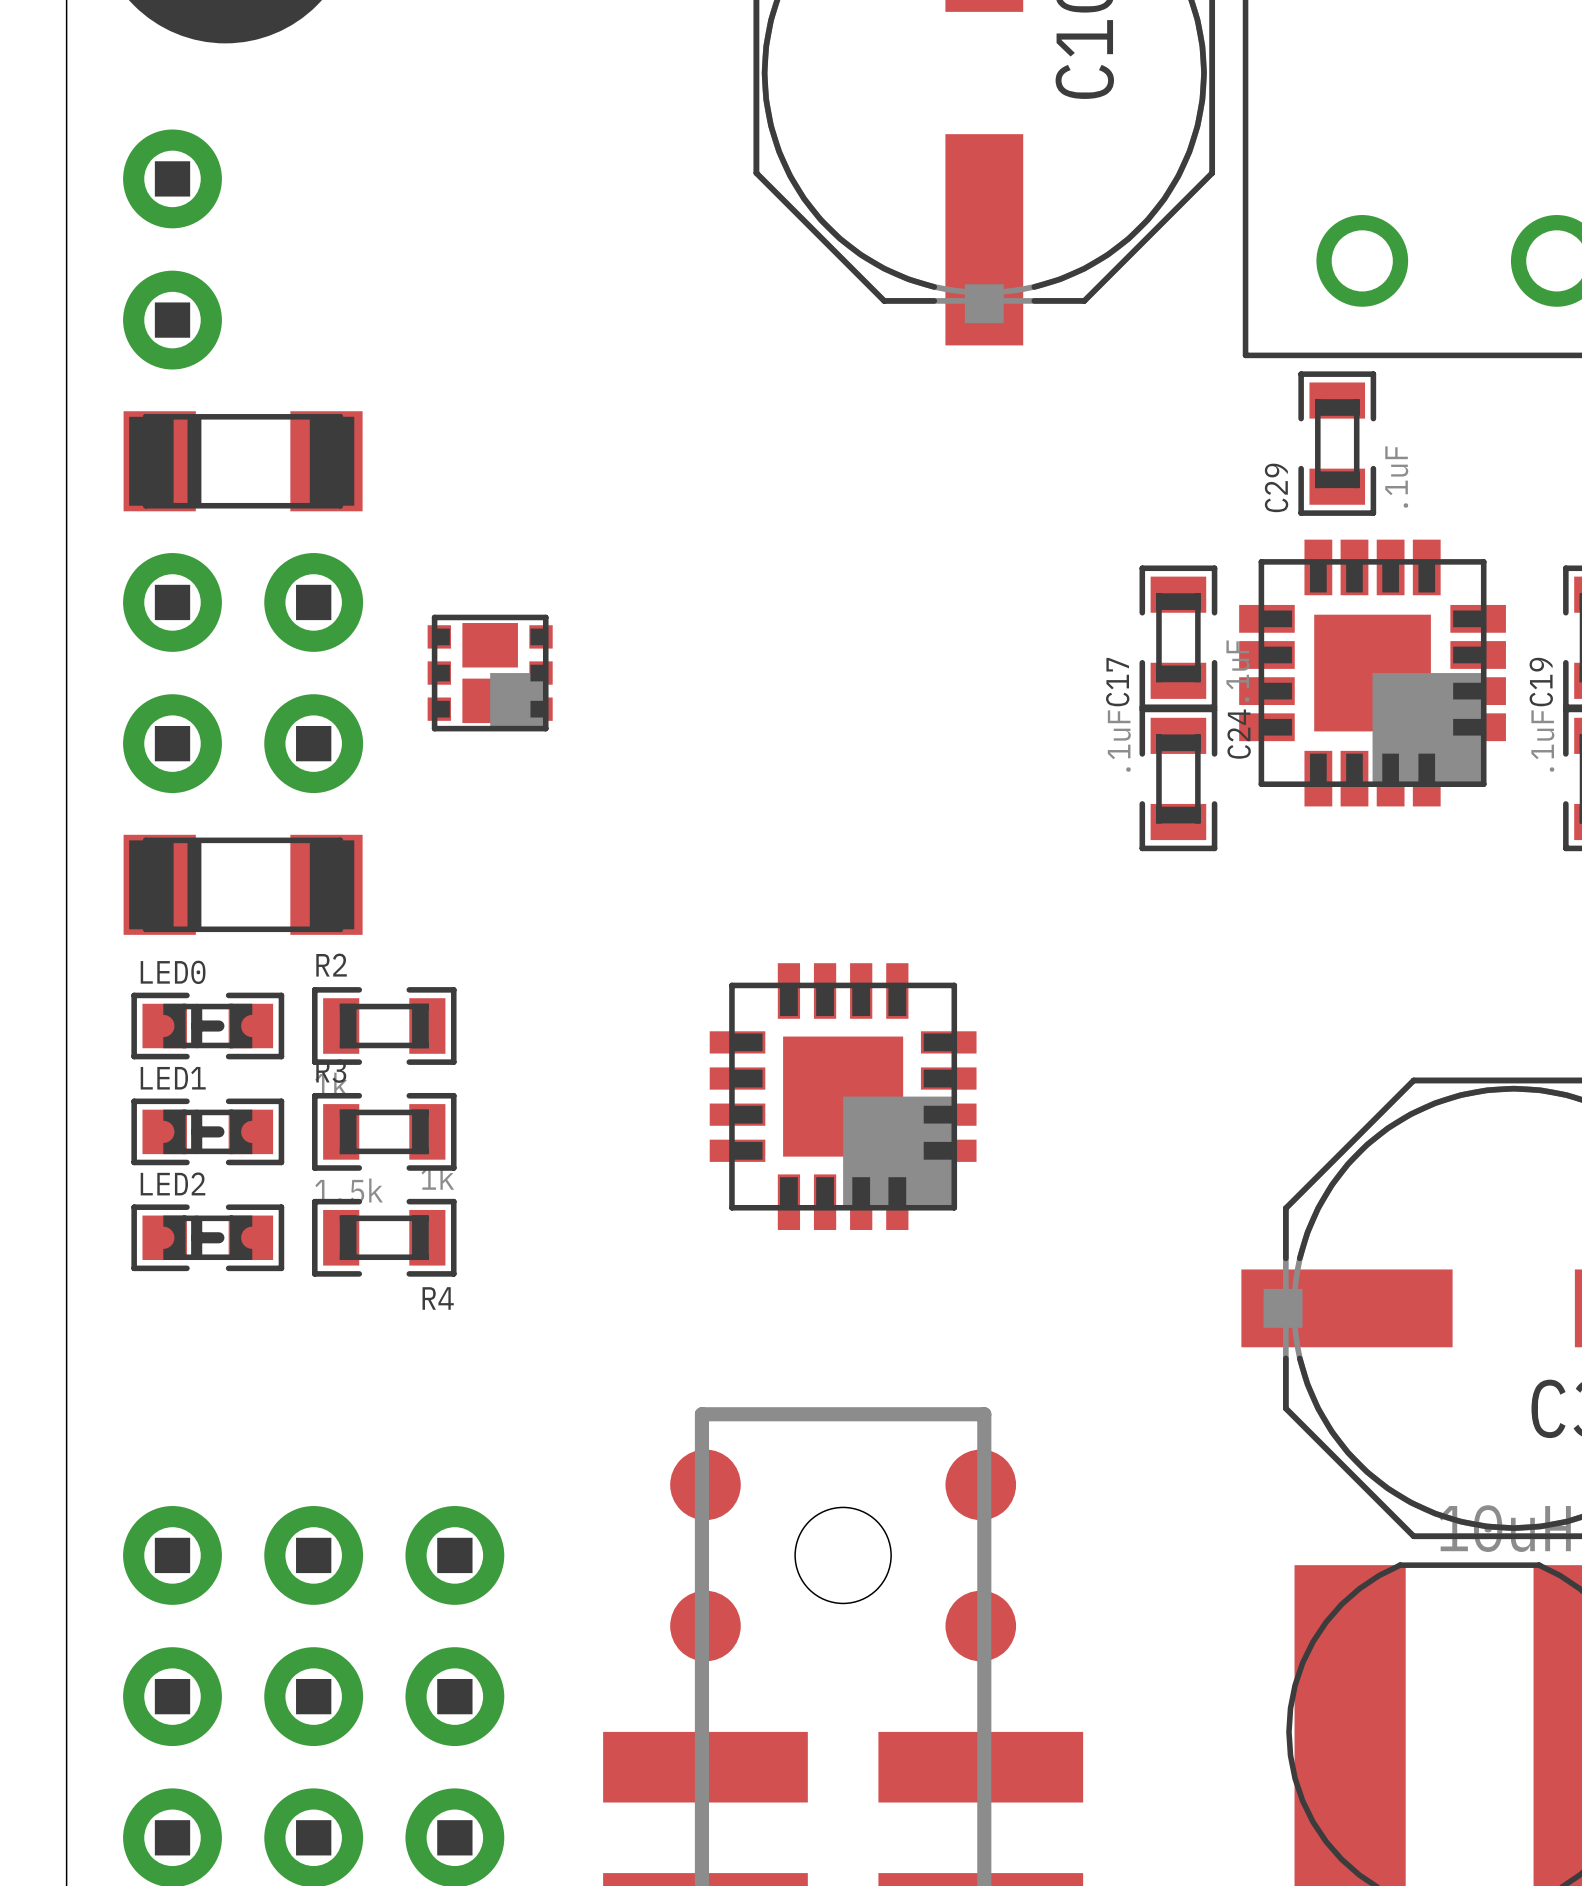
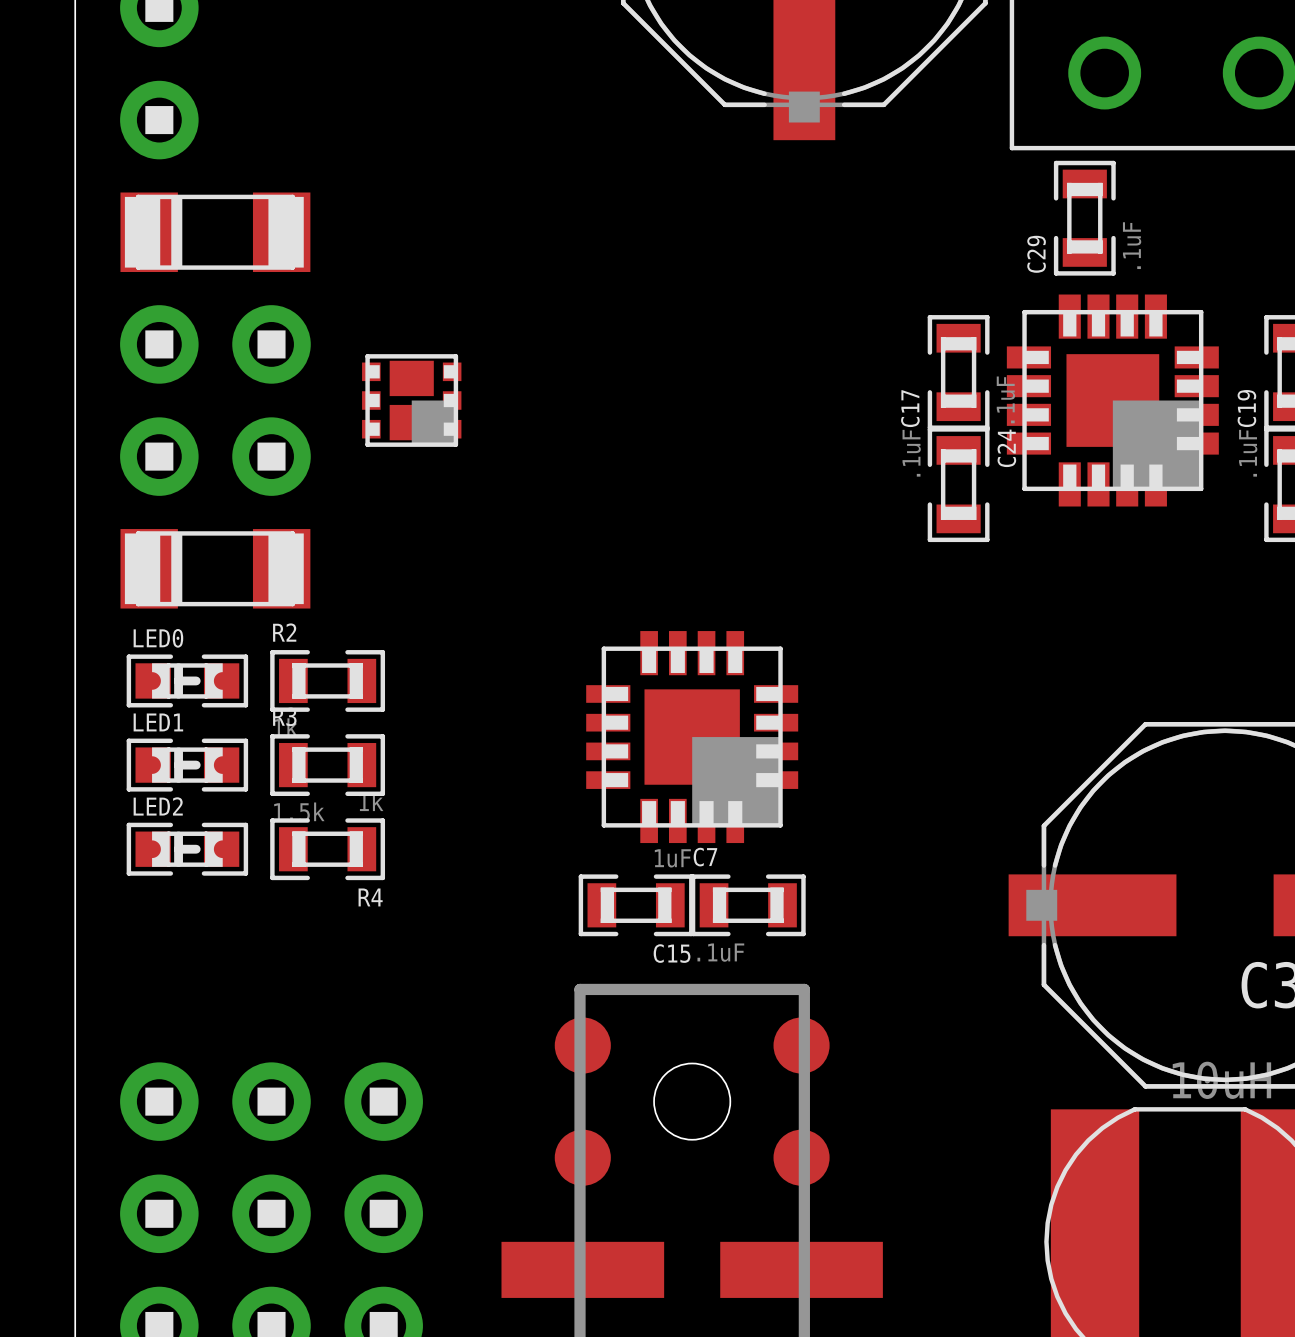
C15: none -> 1uF (636, 905)
C7: none -> .1uF (748, 905)

